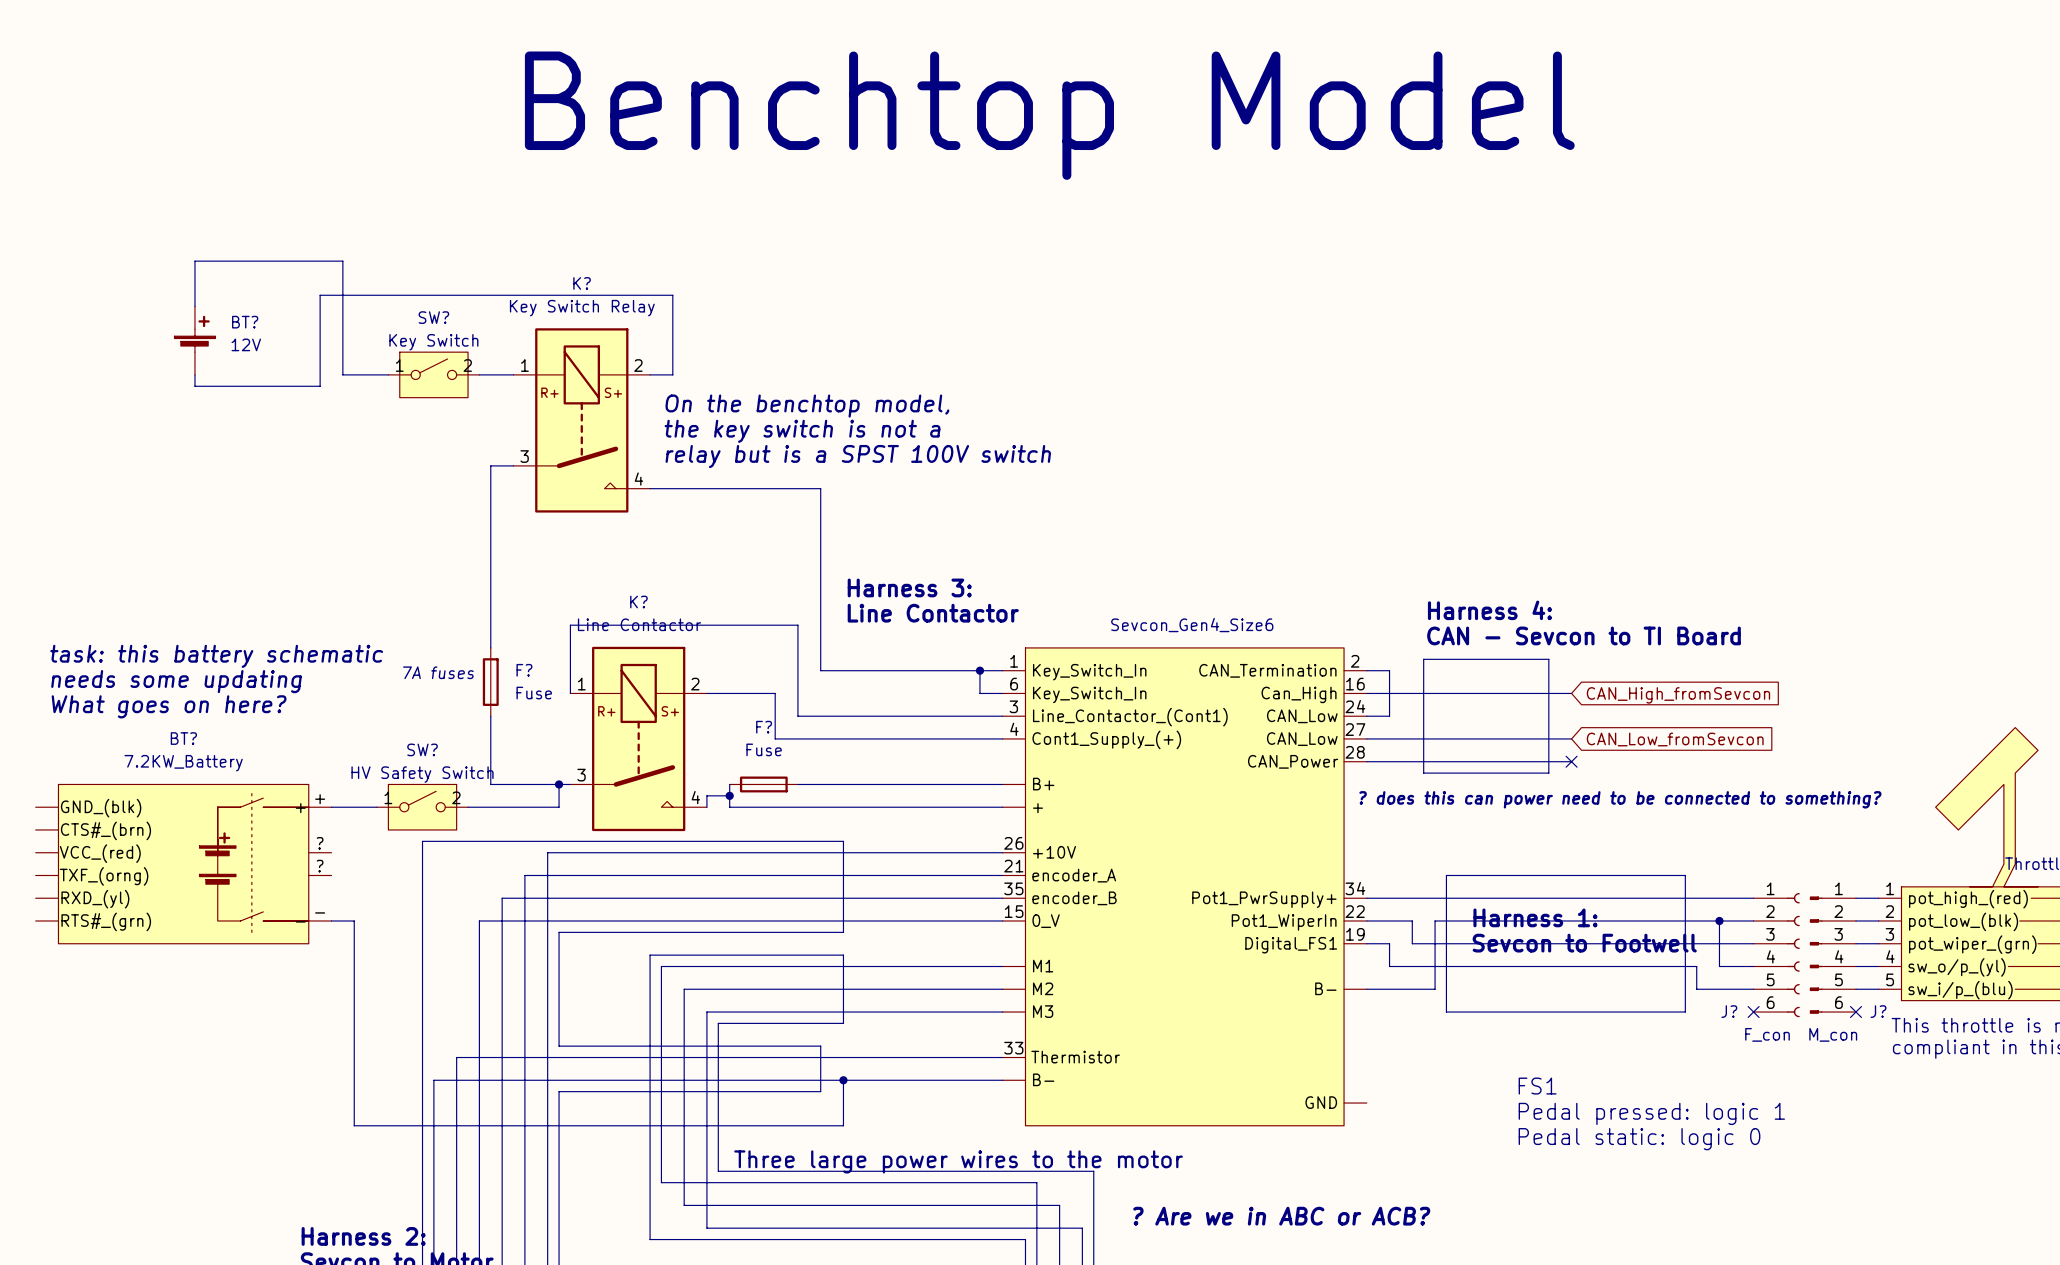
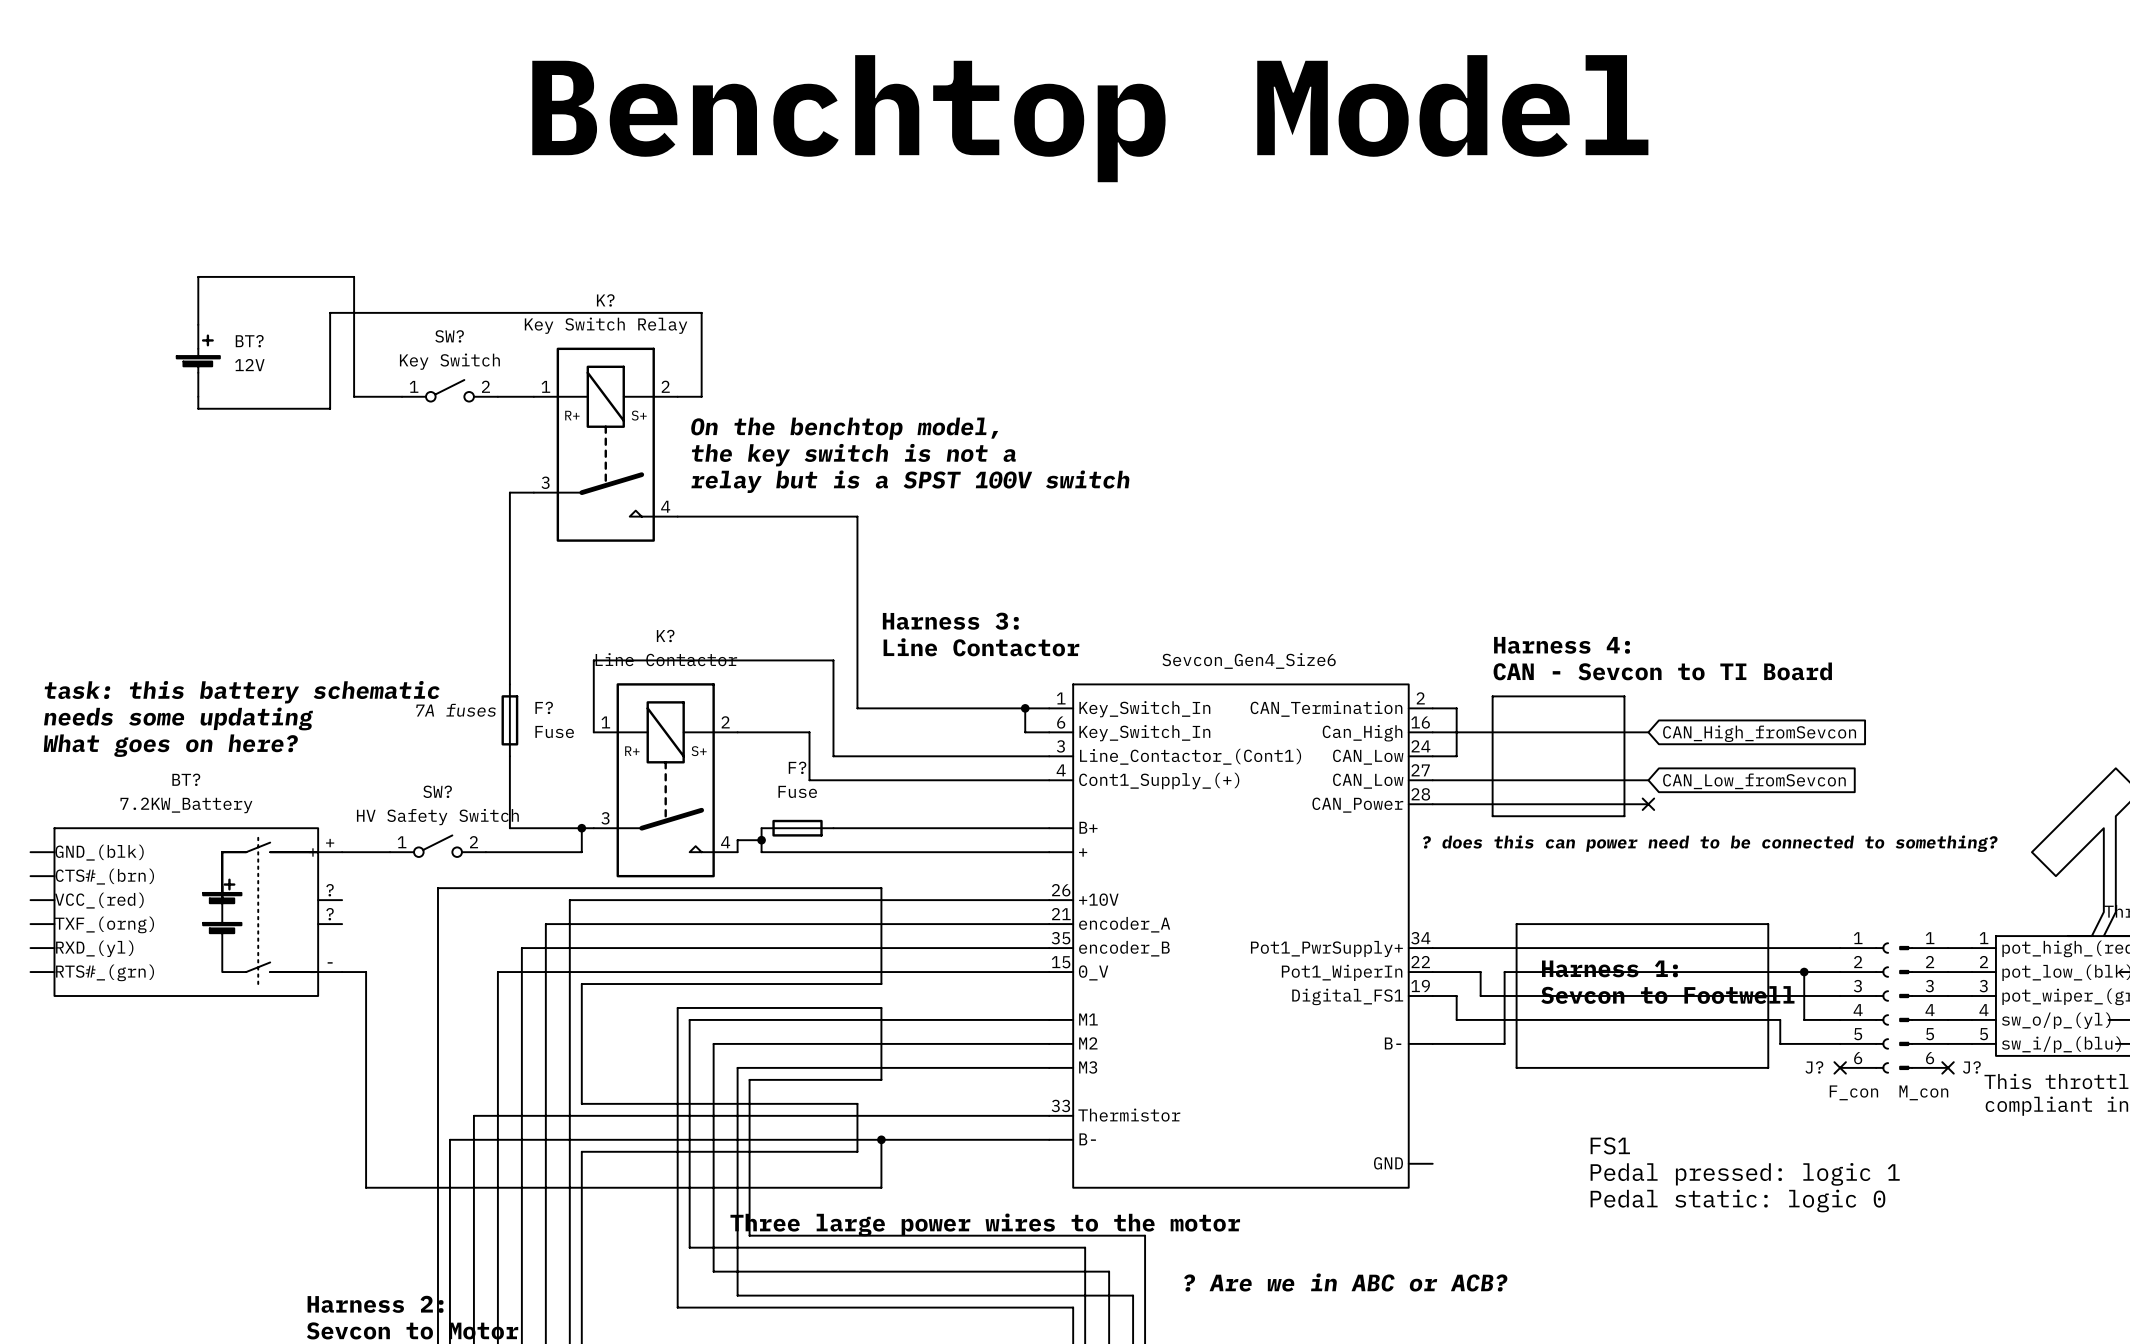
SW? symbol: [388, 352, 480, 398] -> [402, 379, 498, 402]
SW? symbol: [377, 784, 469, 830] -> [390, 835, 486, 857]

